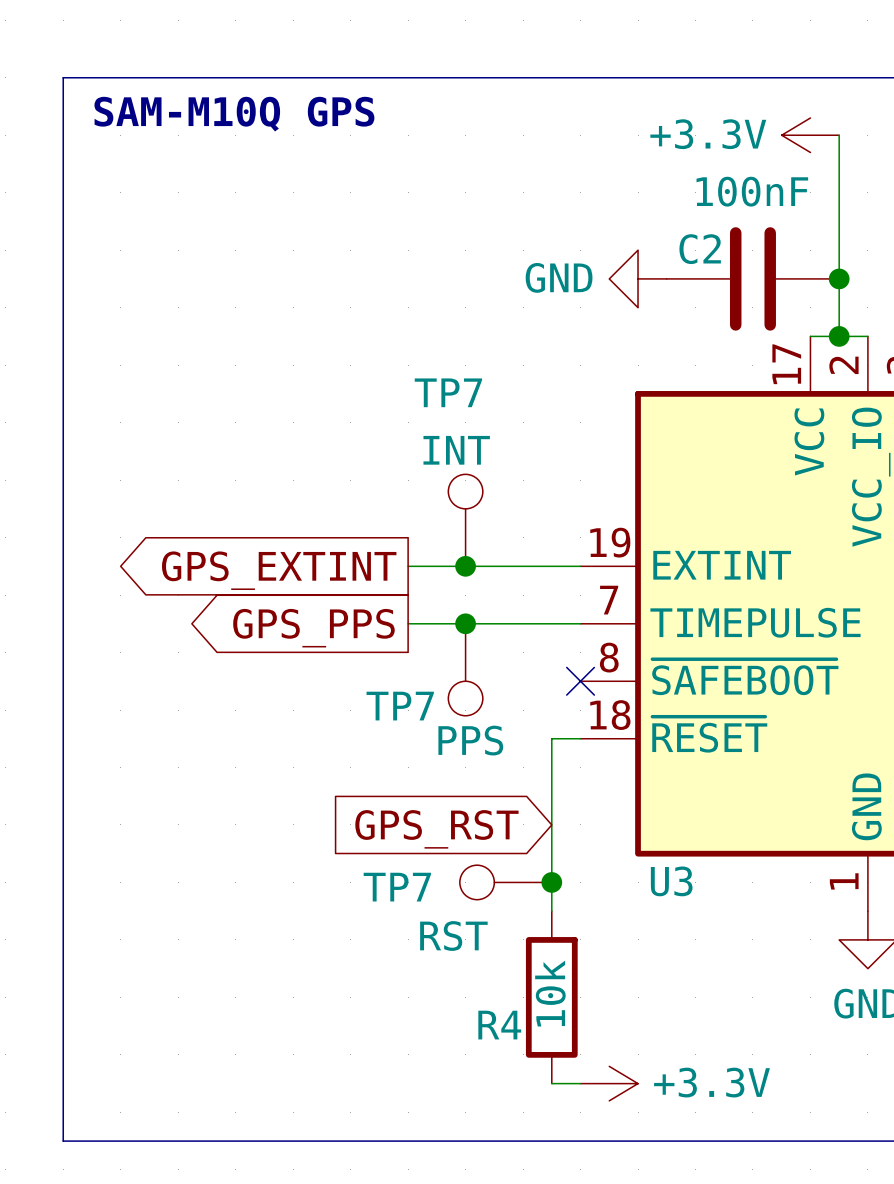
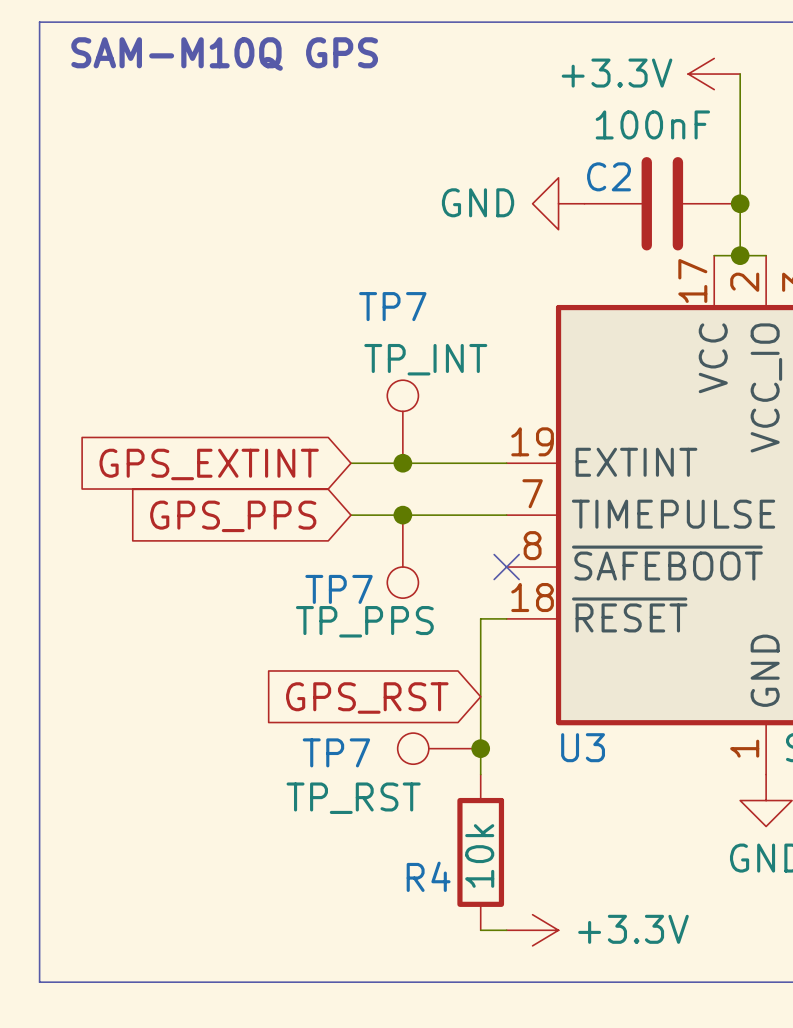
TP7 value: INT (456, 450) -> TP_INT (425, 359)
global label shape: output (279, 570) -> input (209, 464)
global label shape: output (313, 628) -> input (233, 516)
TP7 value: PPS (470, 740) -> TP_PPS (364, 621)
TP7 value: RST (453, 935) -> TP_RST (353, 798)

